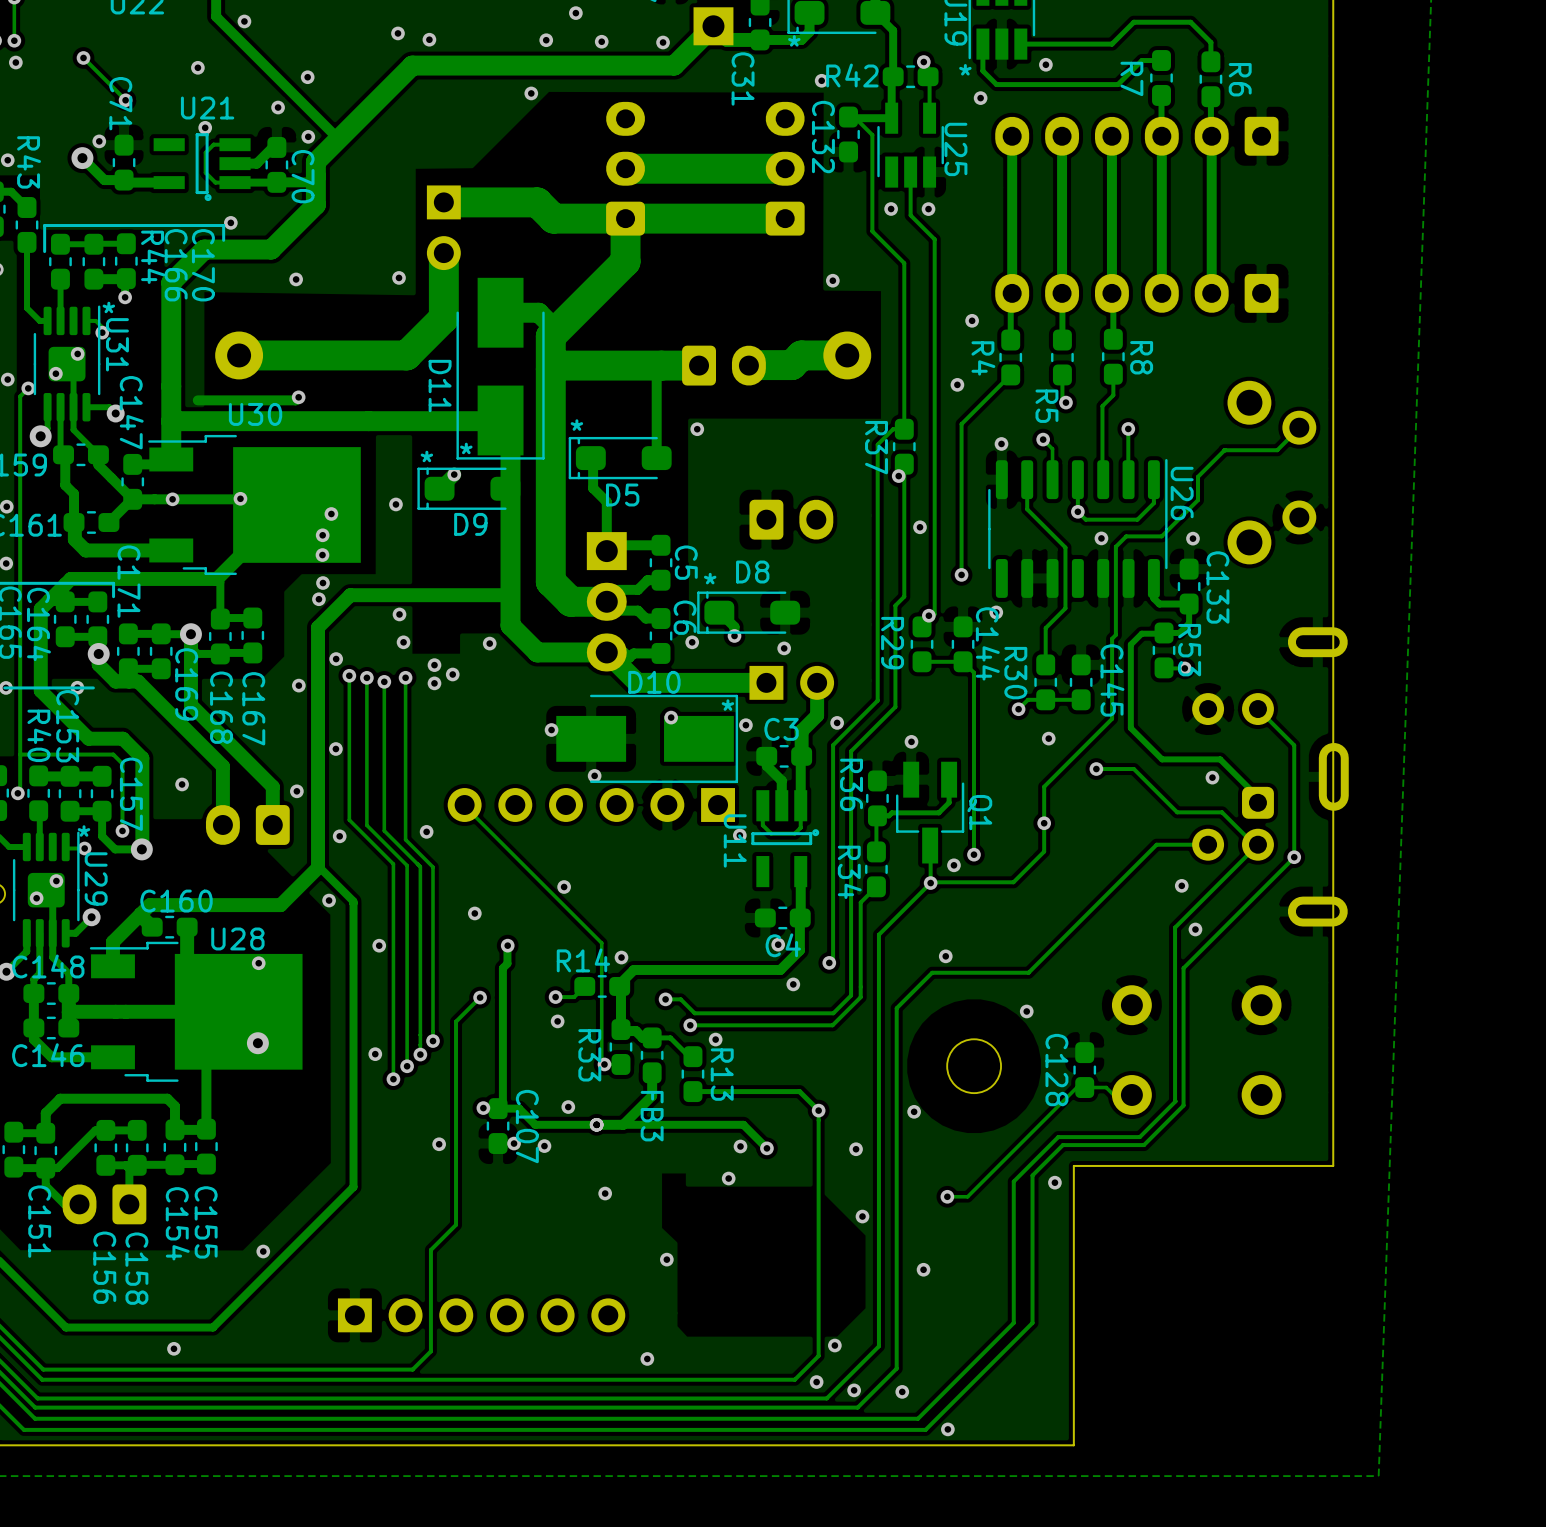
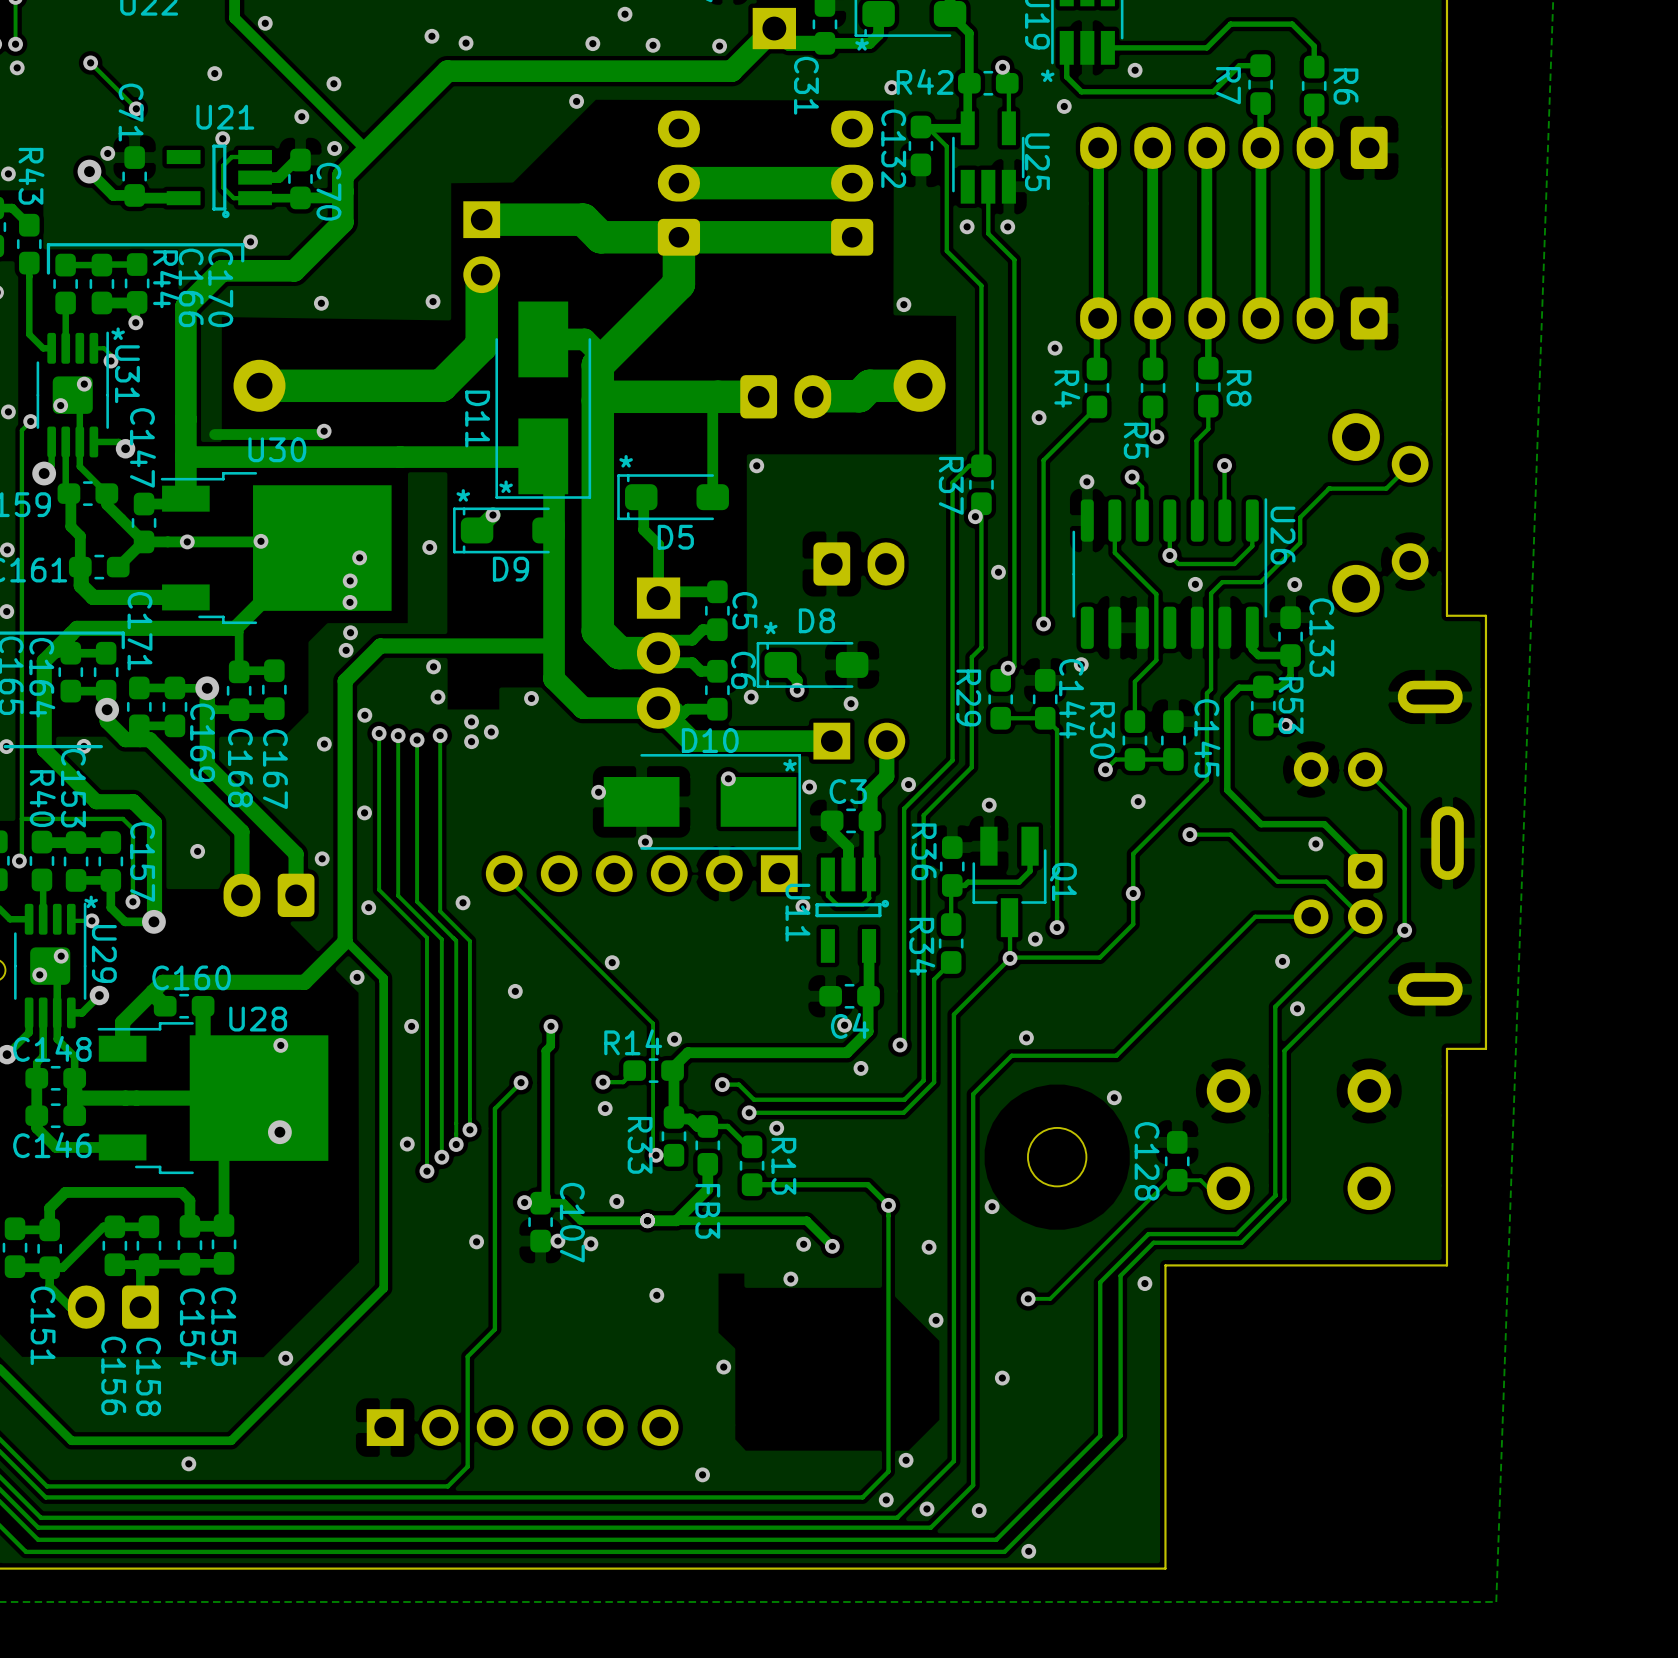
board edge: (1333, 567) (1333, 966) -> (1446, 615) (1485, 615) (1485, 1048) (1446, 1048)

